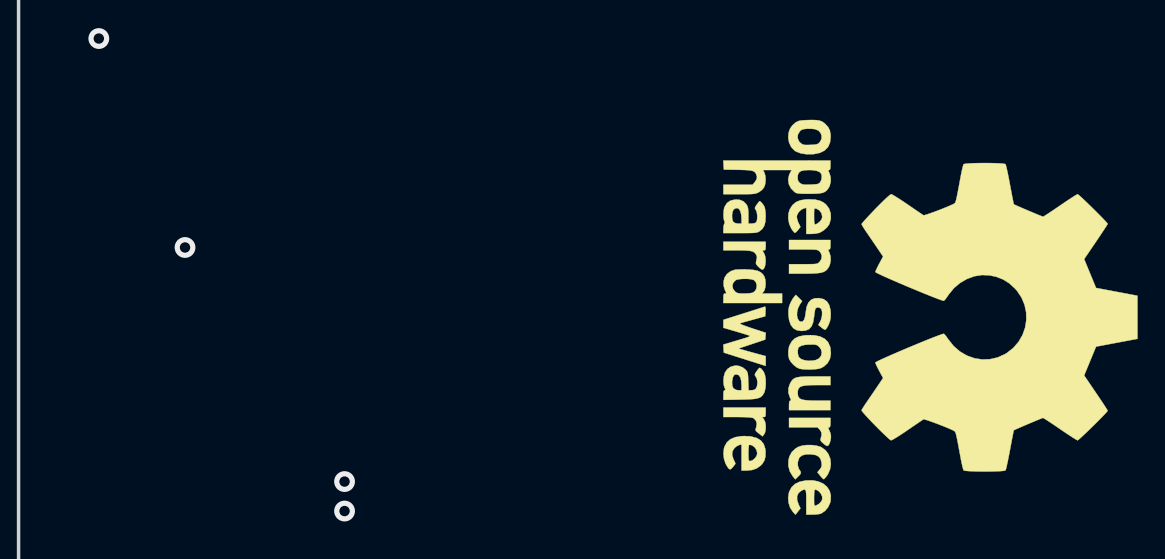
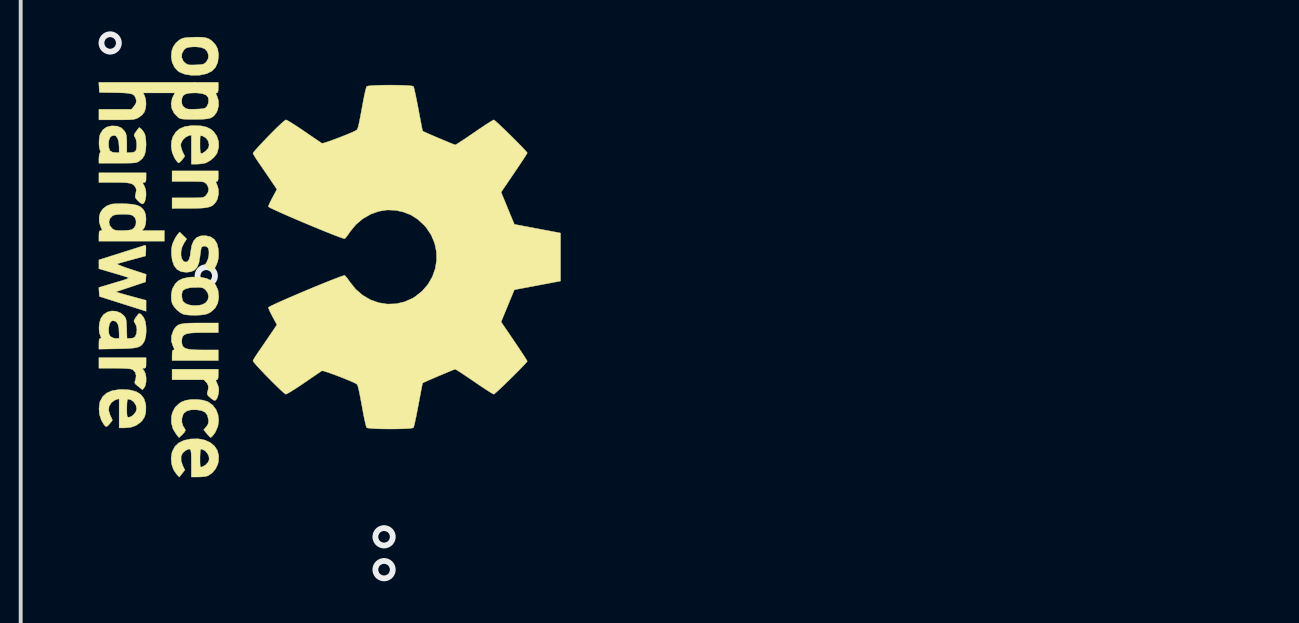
drawing position: (930, 317) -> (329, 257)

